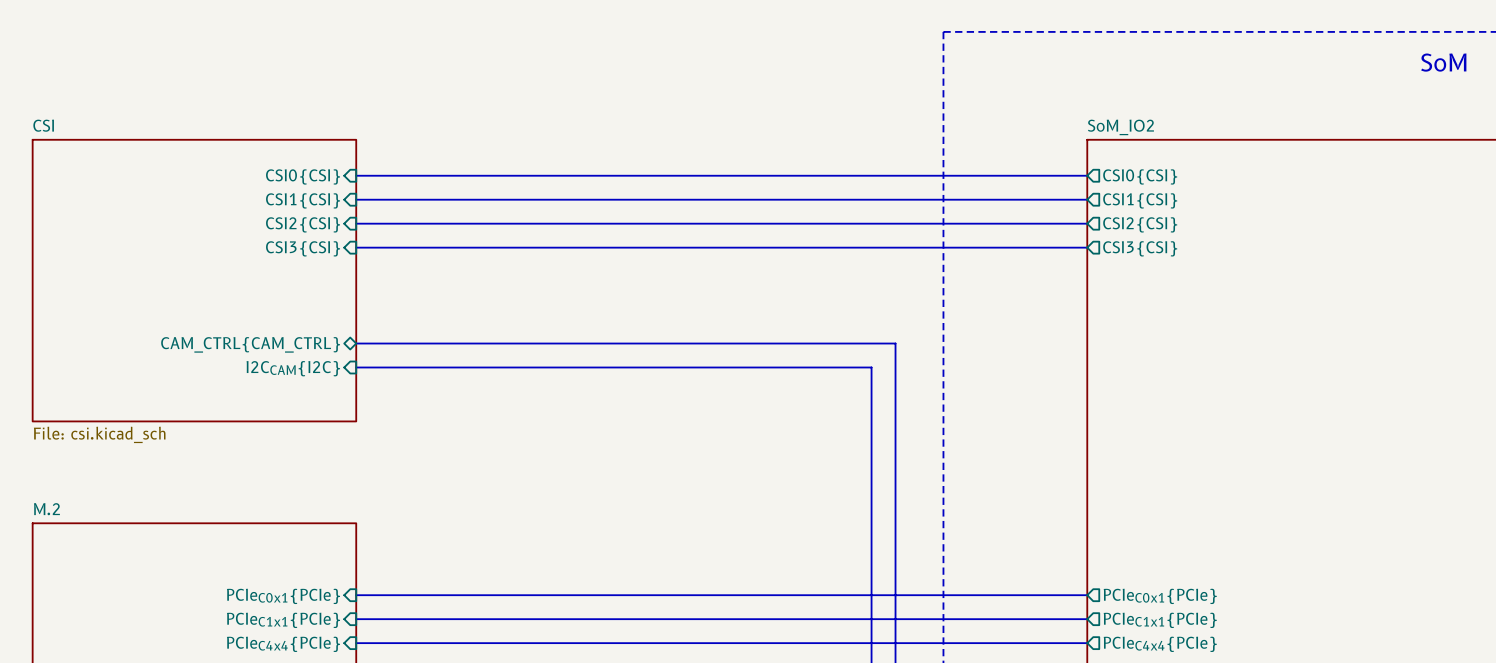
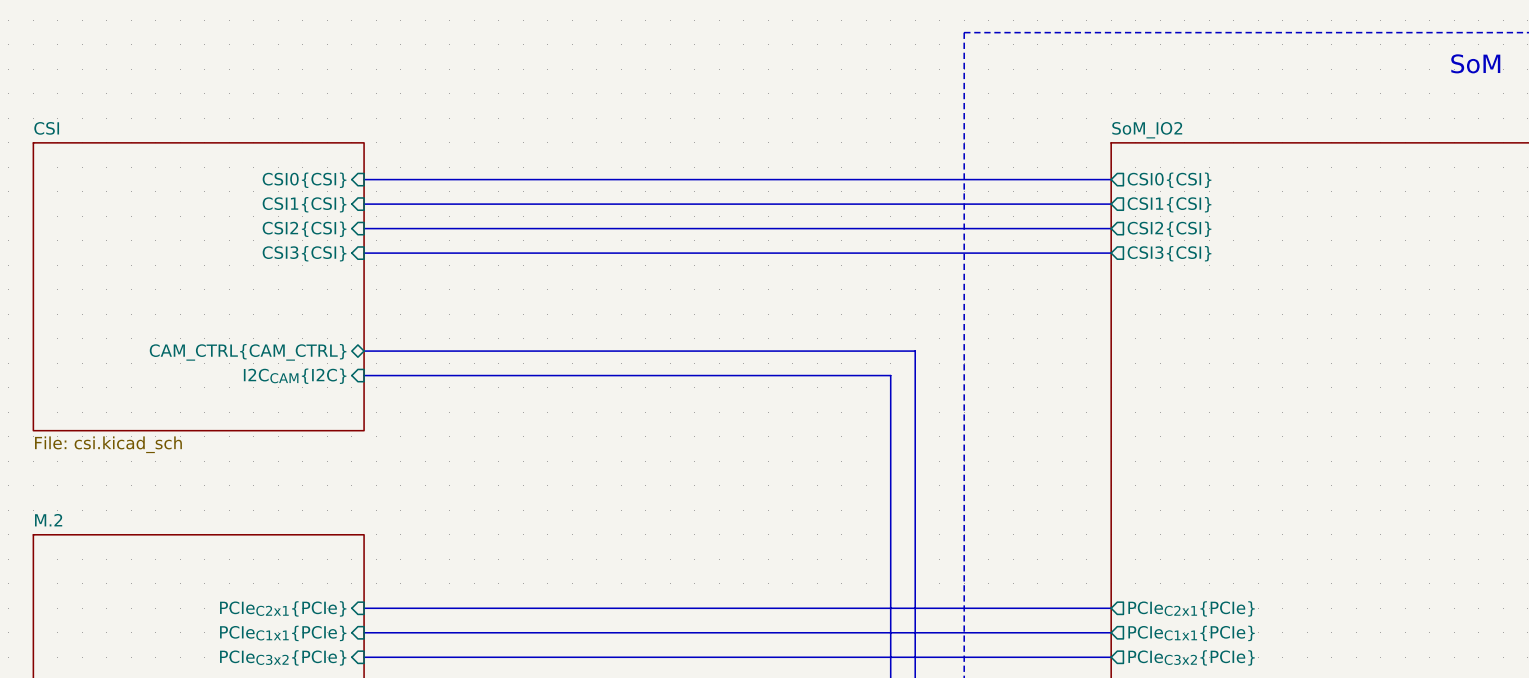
sheet pin: PCIeC0x1{PCIe} (283, 596) -> PCIeC2x1{PCIe} (283, 608)
sheet pin: PCIeC0x1{PCIe} (1160, 596) -> PCIeC2x1{PCIe} (1191, 608)
sheet pin: PCIeC4x4{PCIe} (283, 644) -> PCIeC3x2{PCIe} (283, 657)
sheet pin: PCIeC4x4{PCIe} (1160, 644) -> PCIeC3x2{PCIe} (1191, 657)

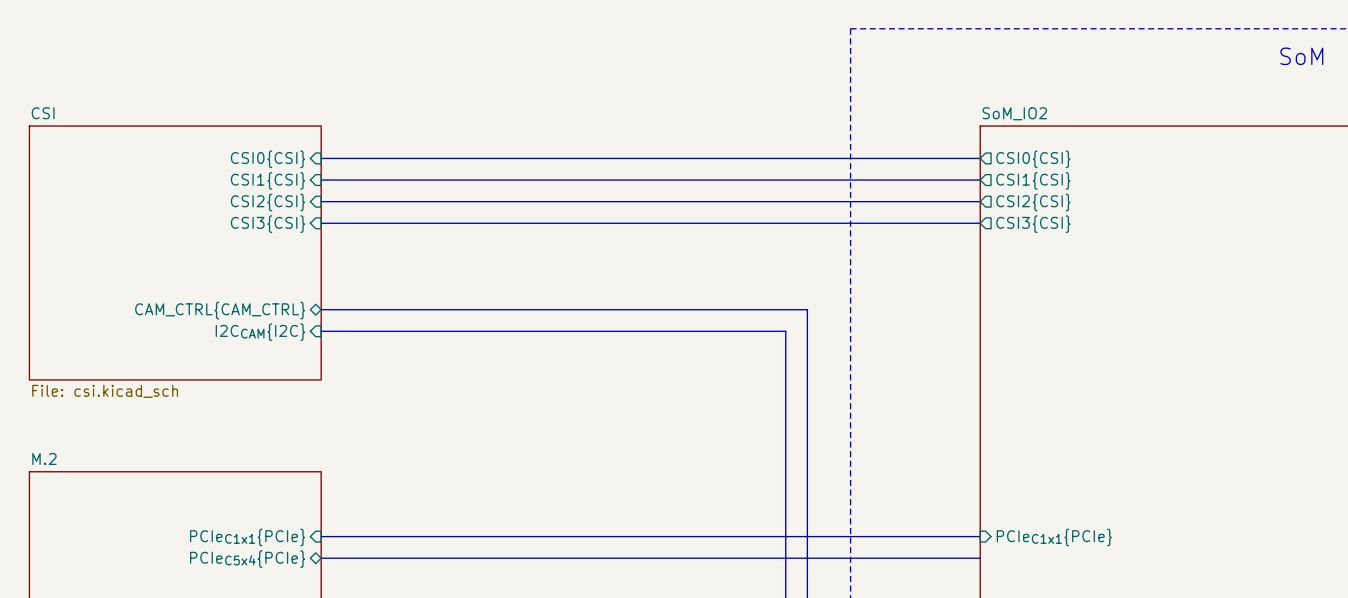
sheet pin: PCIeC2x1{PCIe} (283, 608) -> PCIeC1x1{PCIe} (247, 537)
sheet pin shape: output (1191, 608) -> input (1054, 537)
sheet pin: PCIeC2x1{PCIe} (1191, 608) -> PCIeC1x1{PCIe} (1054, 537)
sheet pin shape: input (283, 633) -> bidirectional (247, 559)
sheet pin: PCIeC1x1{PCIe} (283, 633) -> PCIeC5x4{PCIe} (247, 559)
sheet pin: PCIeC1x1{PCIe} (1191, 633) -> none
sheet pin: PCIeC3x2{PCIe} (283, 657) -> none
bus: (364, 657) (1111, 657) -> none
sheet pin: PCIeC3x2{PCIe} (1191, 657) -> none

